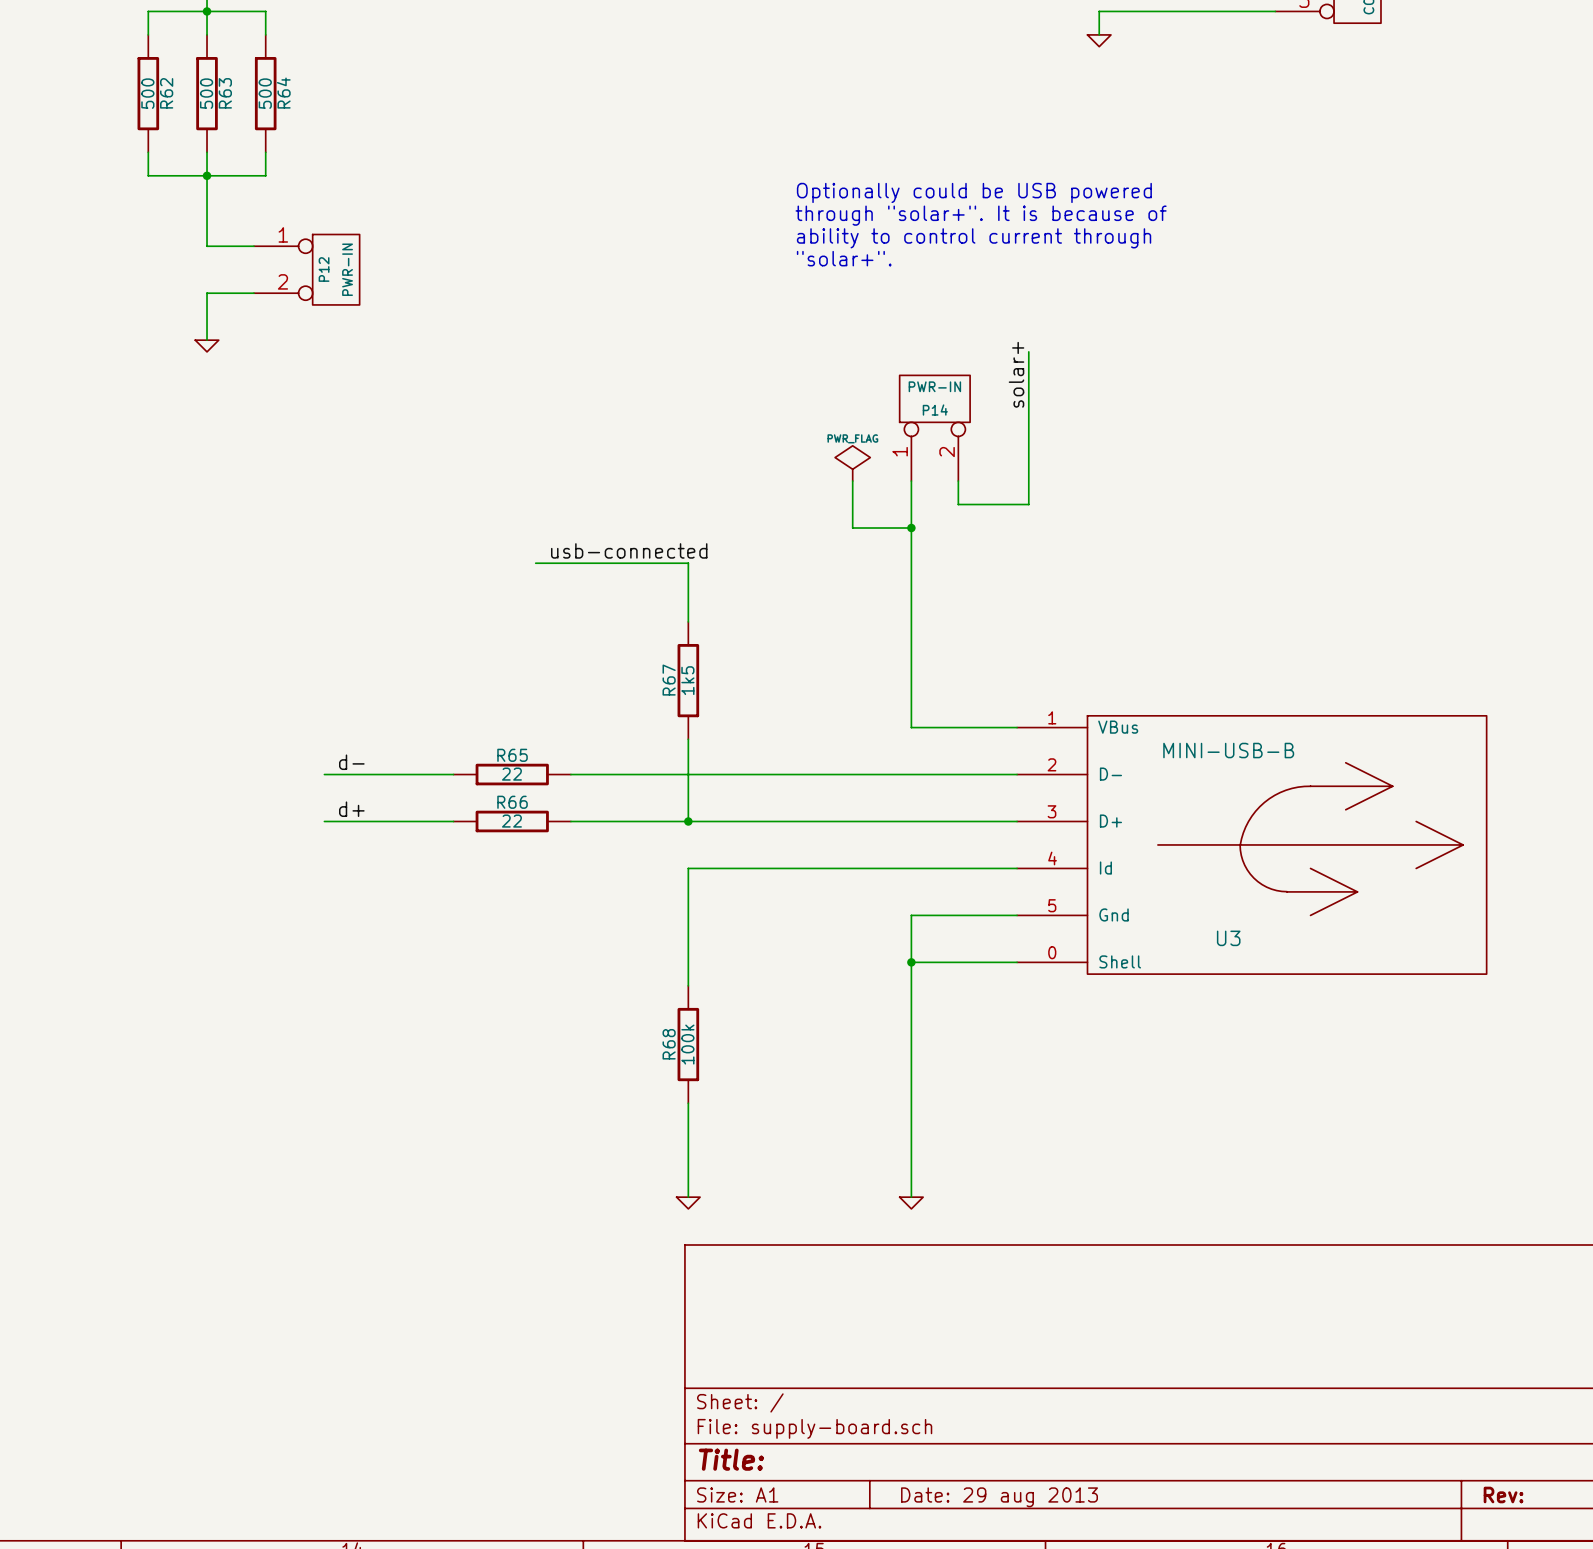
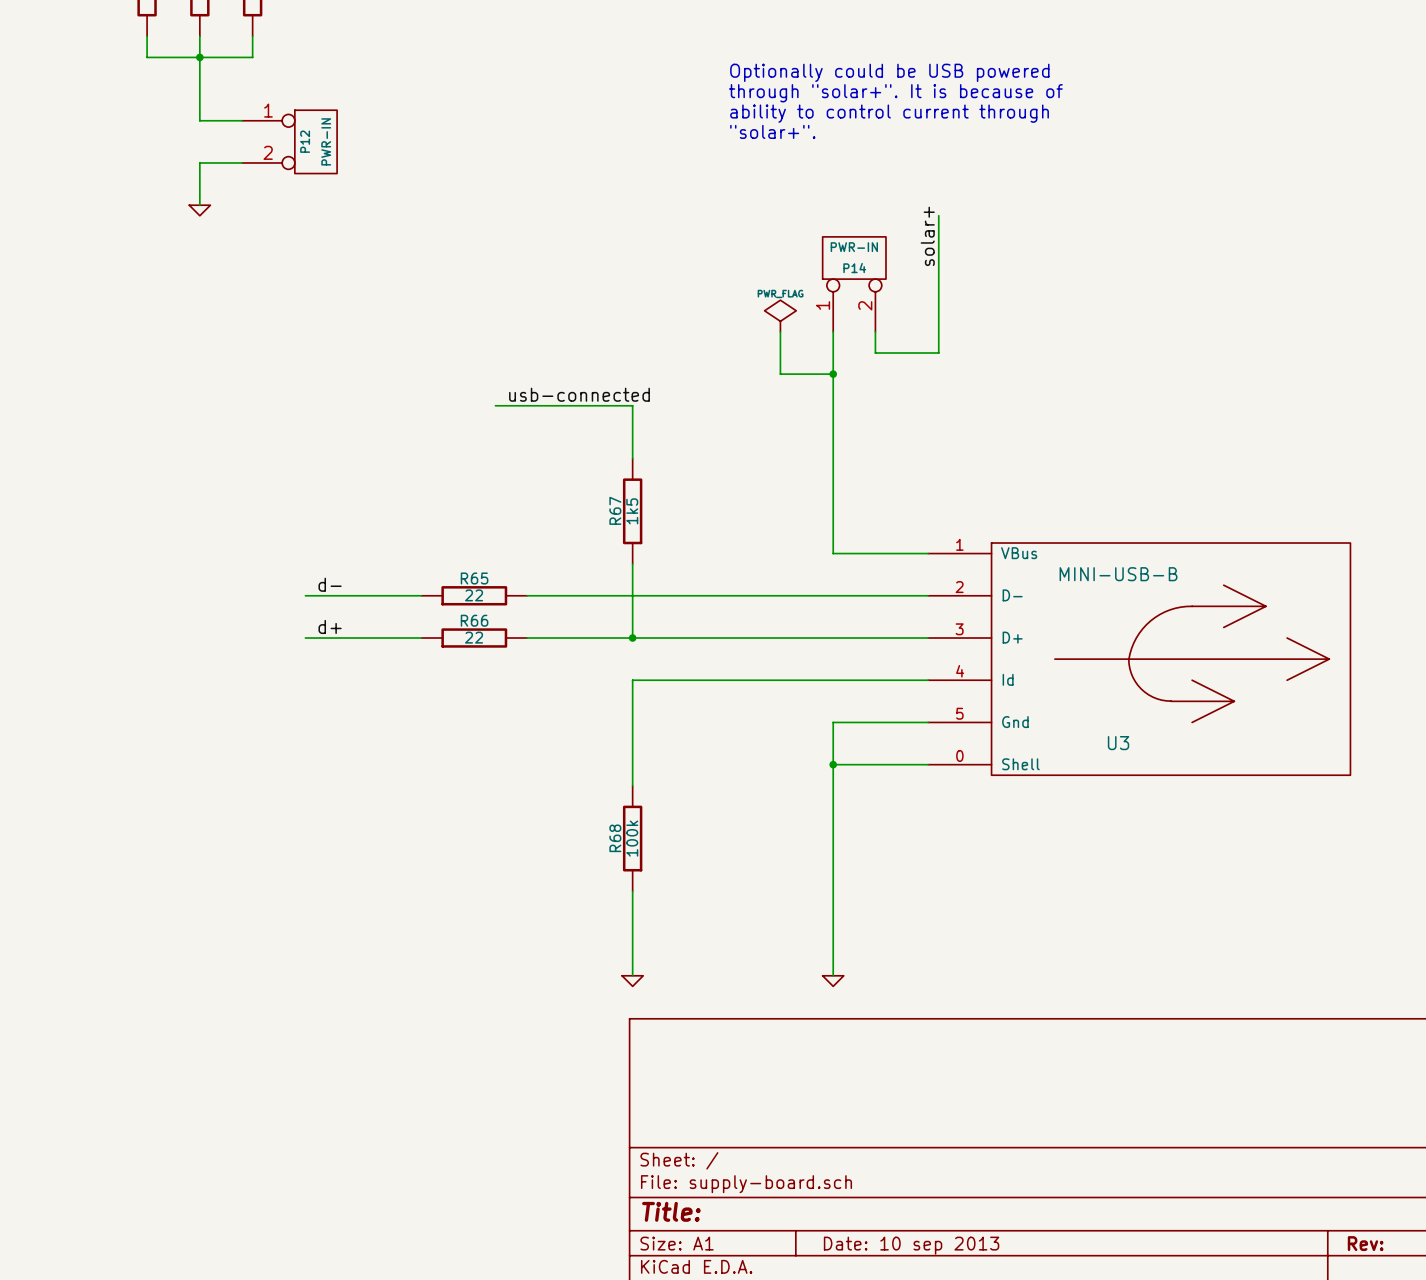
title block: Date: 29 aug 2013 (999, 1497) -> Date: 10 sep 2013 (911, 1245)

